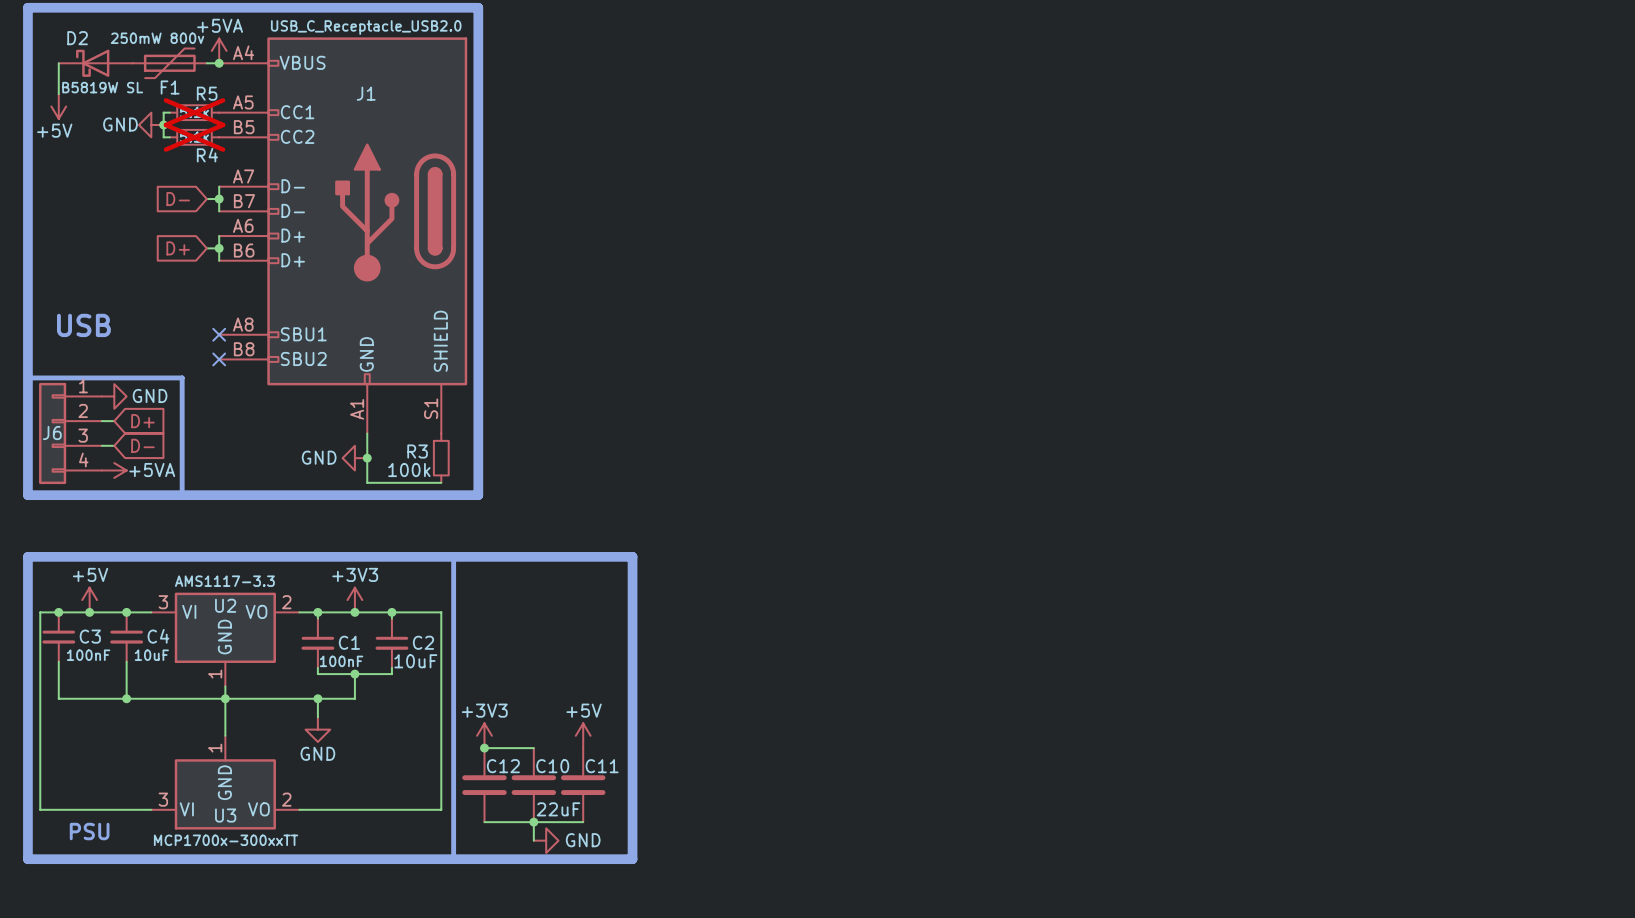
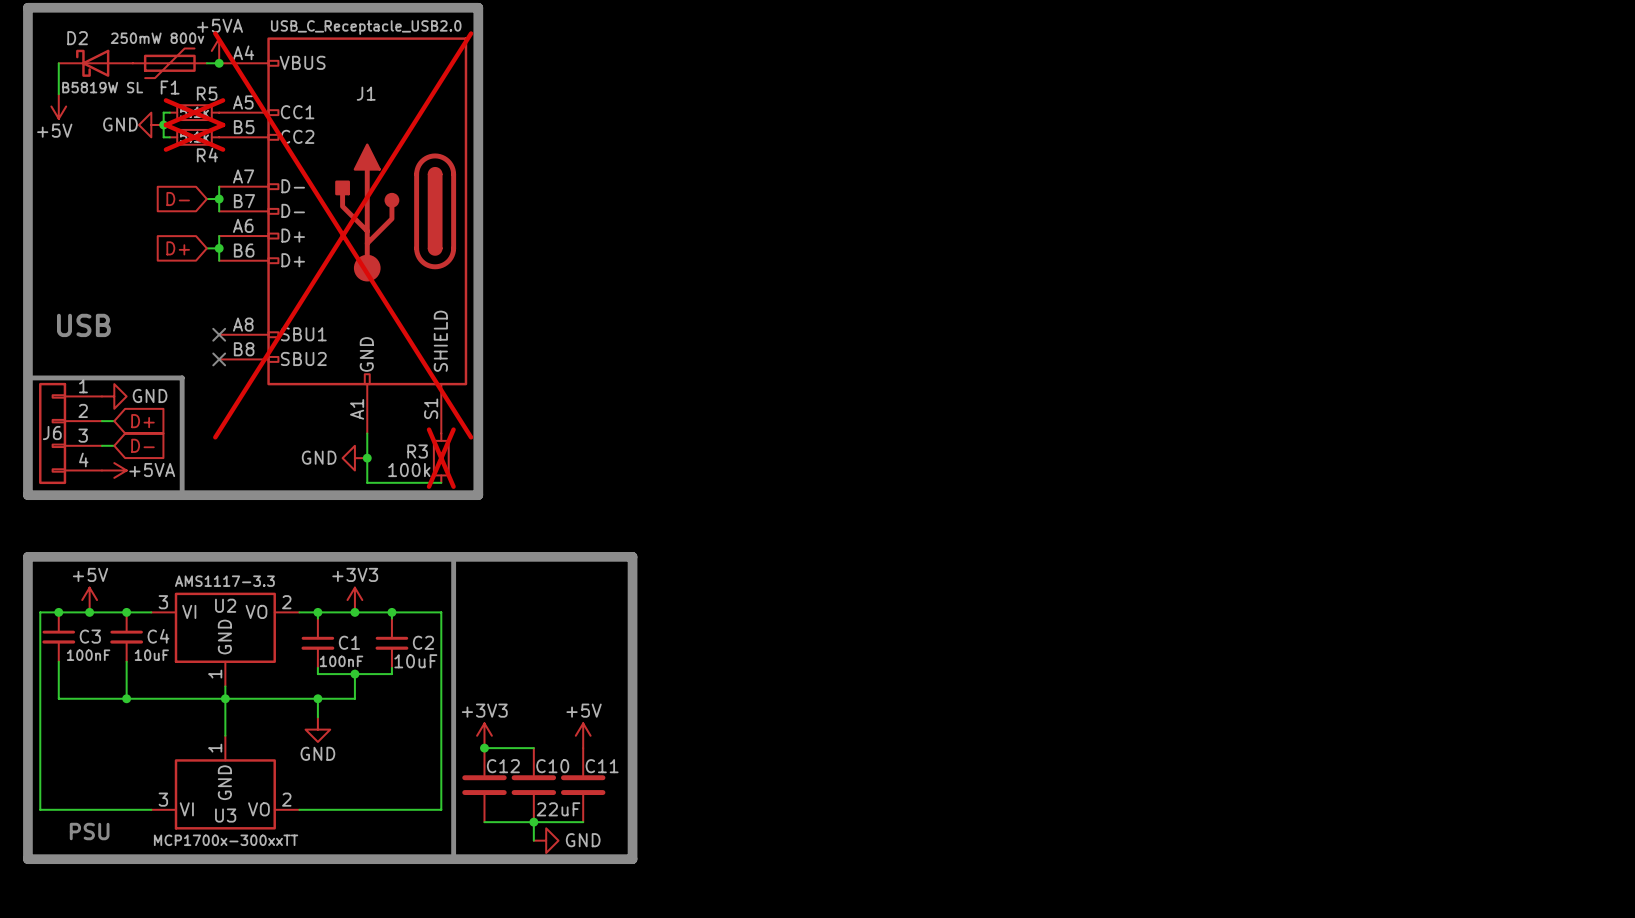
J1 do-not-place cross: none -> (343, 235)
R3 do-not-place cross: none -> (441, 458)

